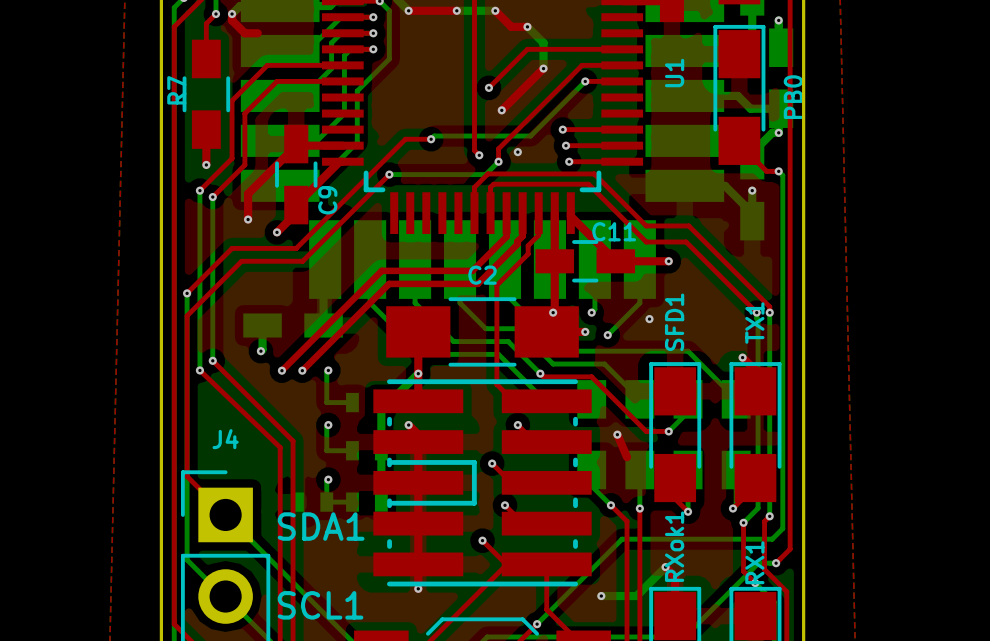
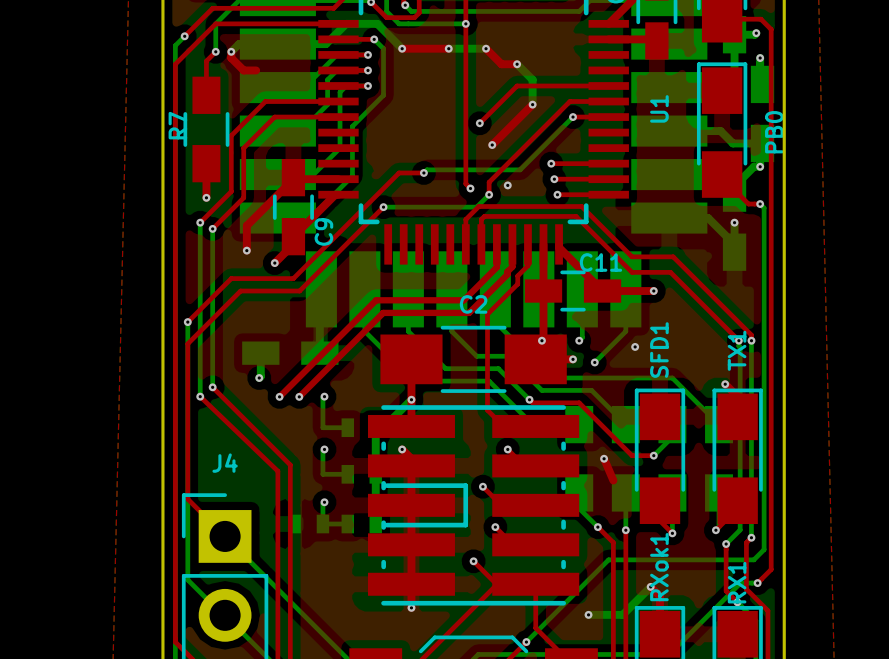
text: SDA1 (321, 526) -> none
text: SCL1 (320, 605) -> none

